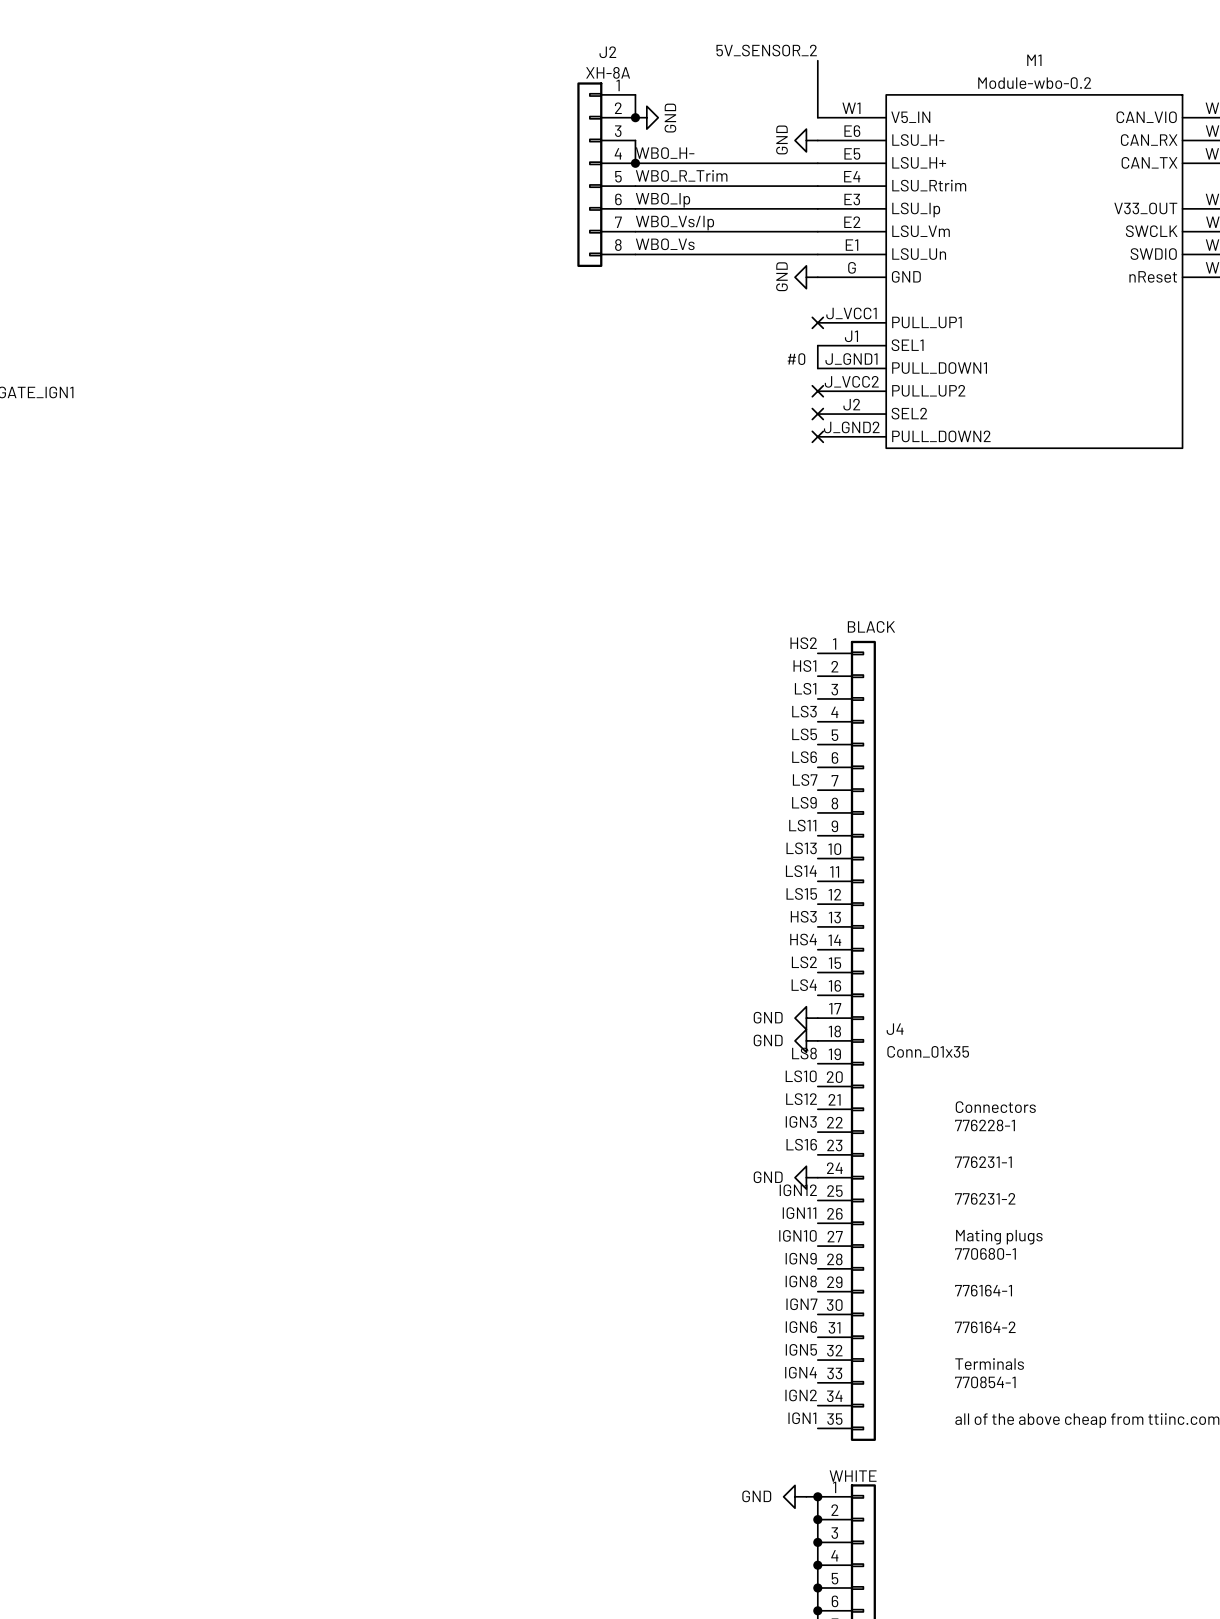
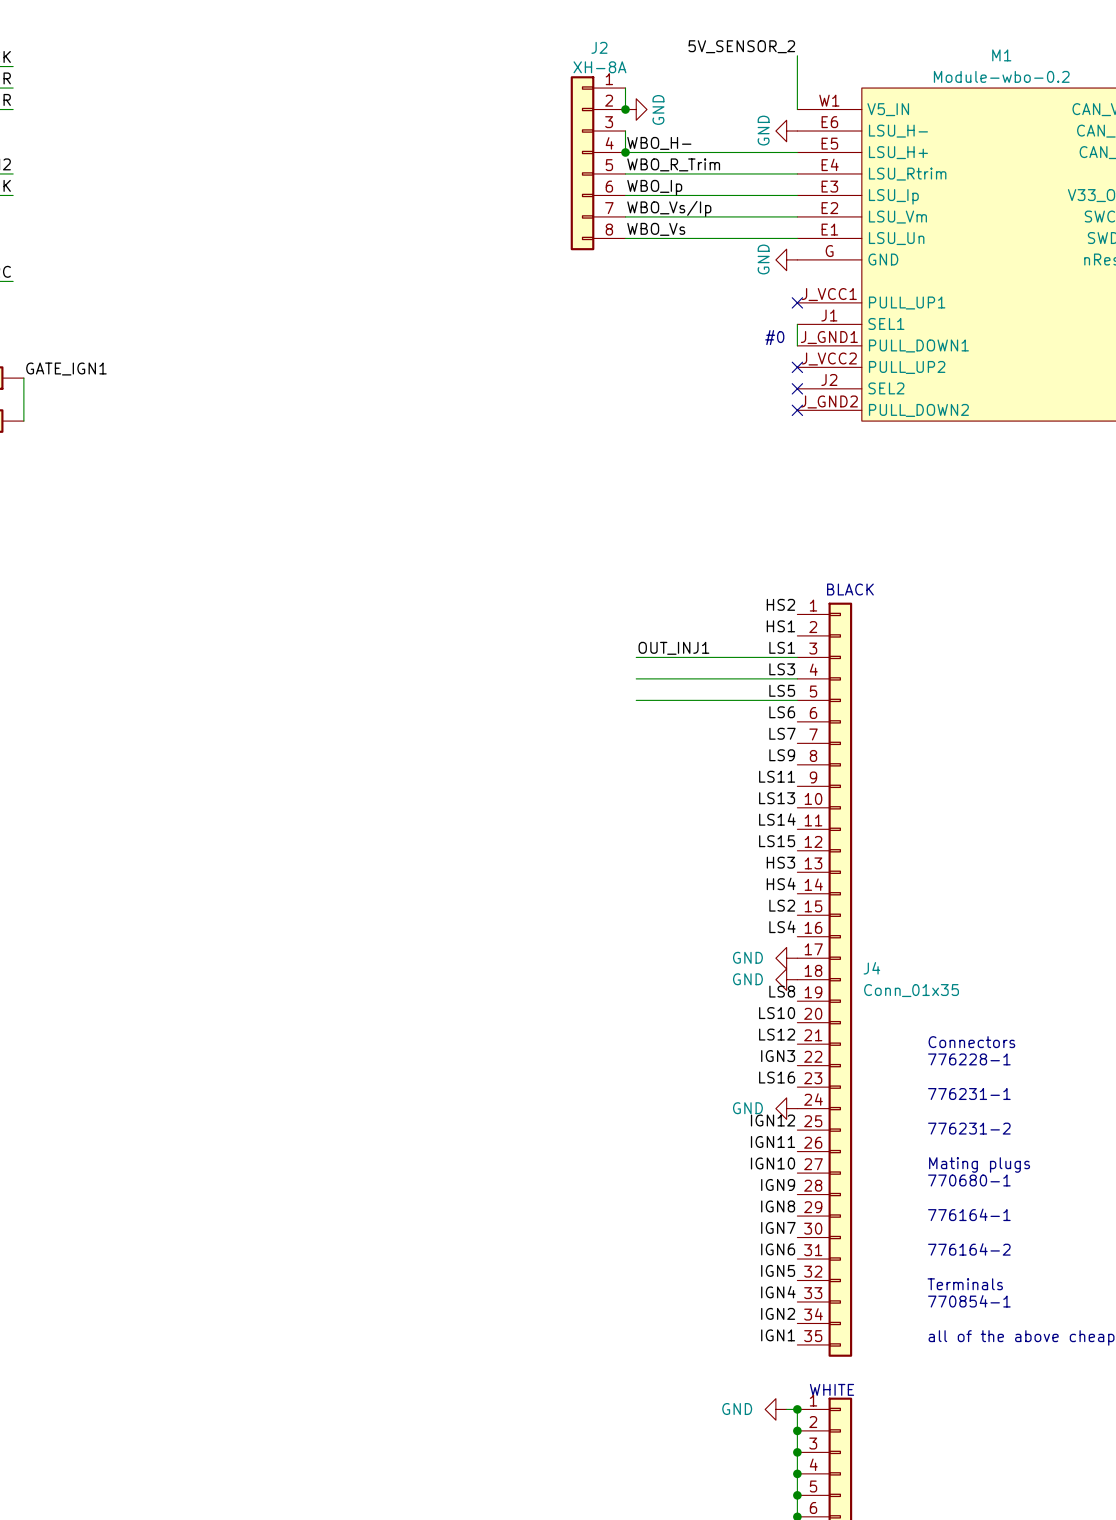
label: none -> OUT_INJ1 (673, 648)
wire: none -> (636, 657) (797, 657)
wire: none -> (636, 678) (797, 678)
wire: none -> (636, 700) (797, 700)

